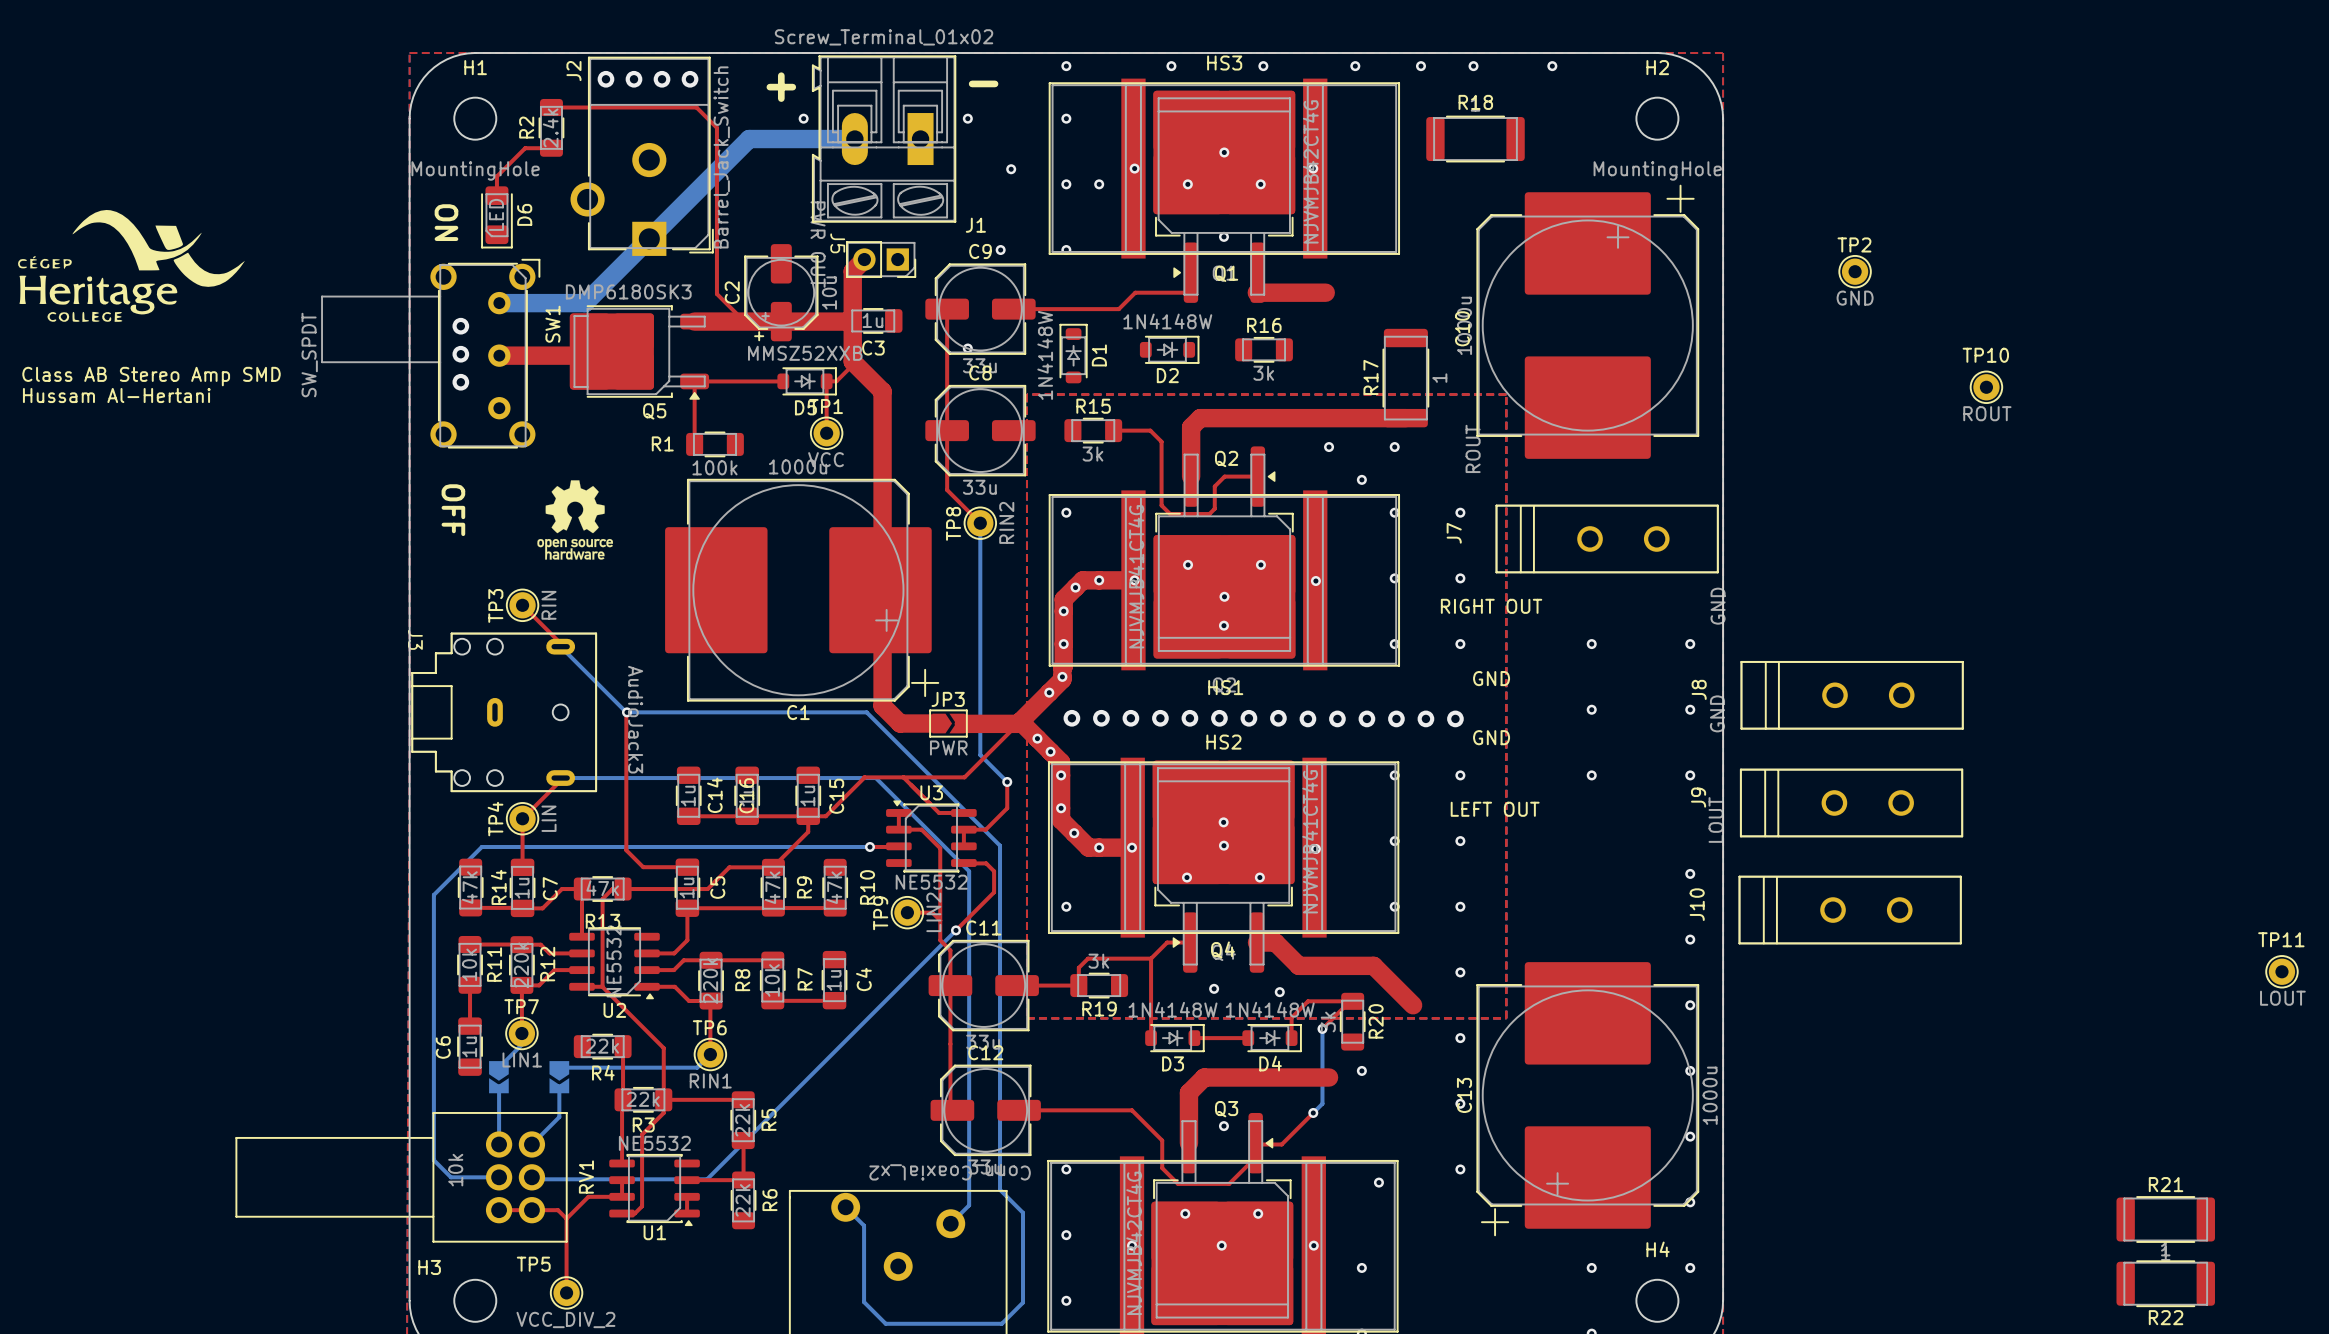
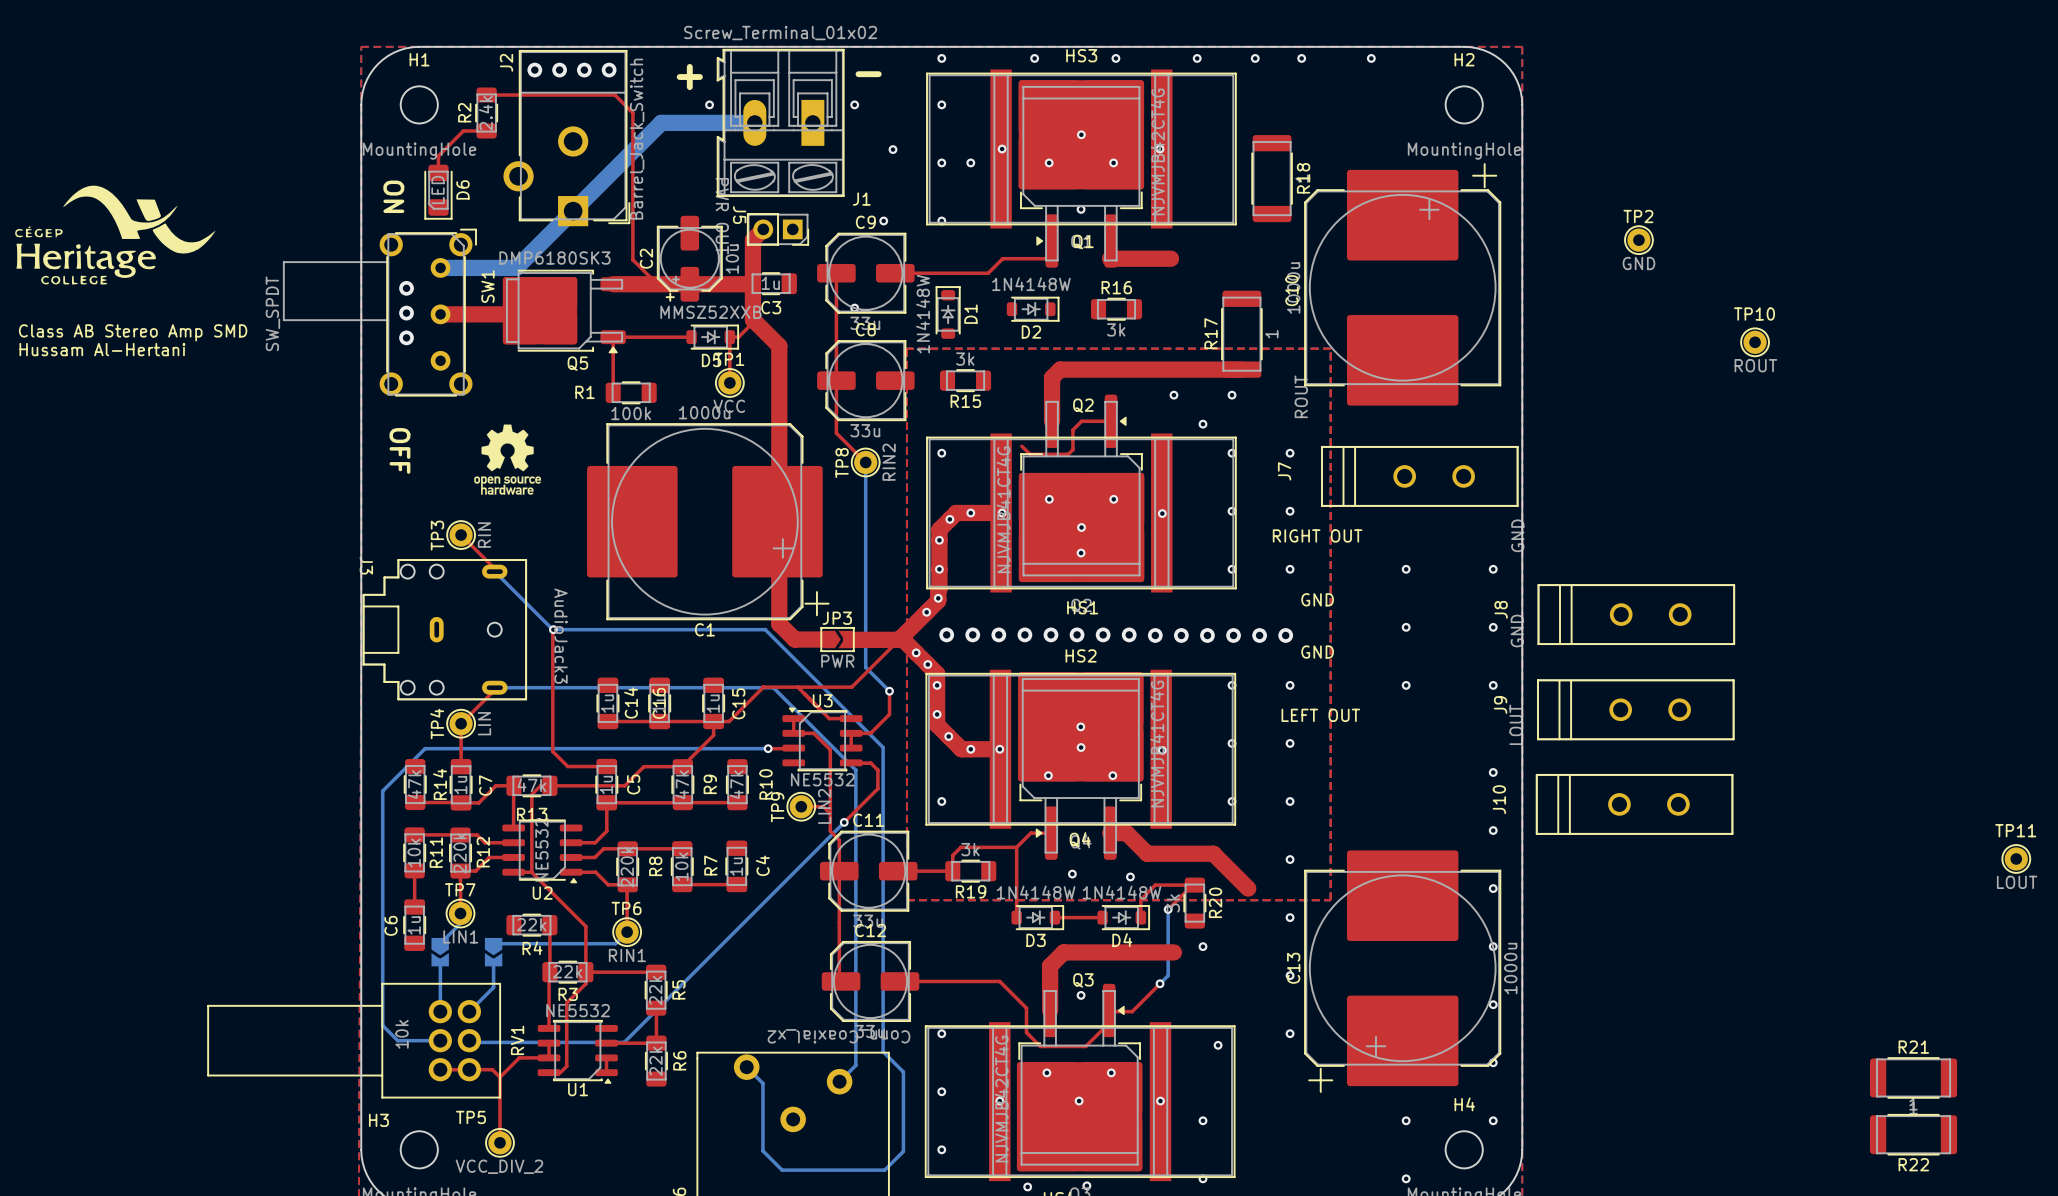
R18 rotation: 0° (1475, 139) -> 90° clockwise (1272, 178)
R18 position: (1475, 139) -> (1272, 178)
R15 name position: R15 (1093, 406) -> R15 (965, 401)
top track: (1113, 430) (1150, 430) (1161, 441) (1161, 505) (1170, 514) -> (1021, 446) (1029, 454) (1033, 454)
R15 value position: 3k (1092, 454) -> 3k (965, 359)

